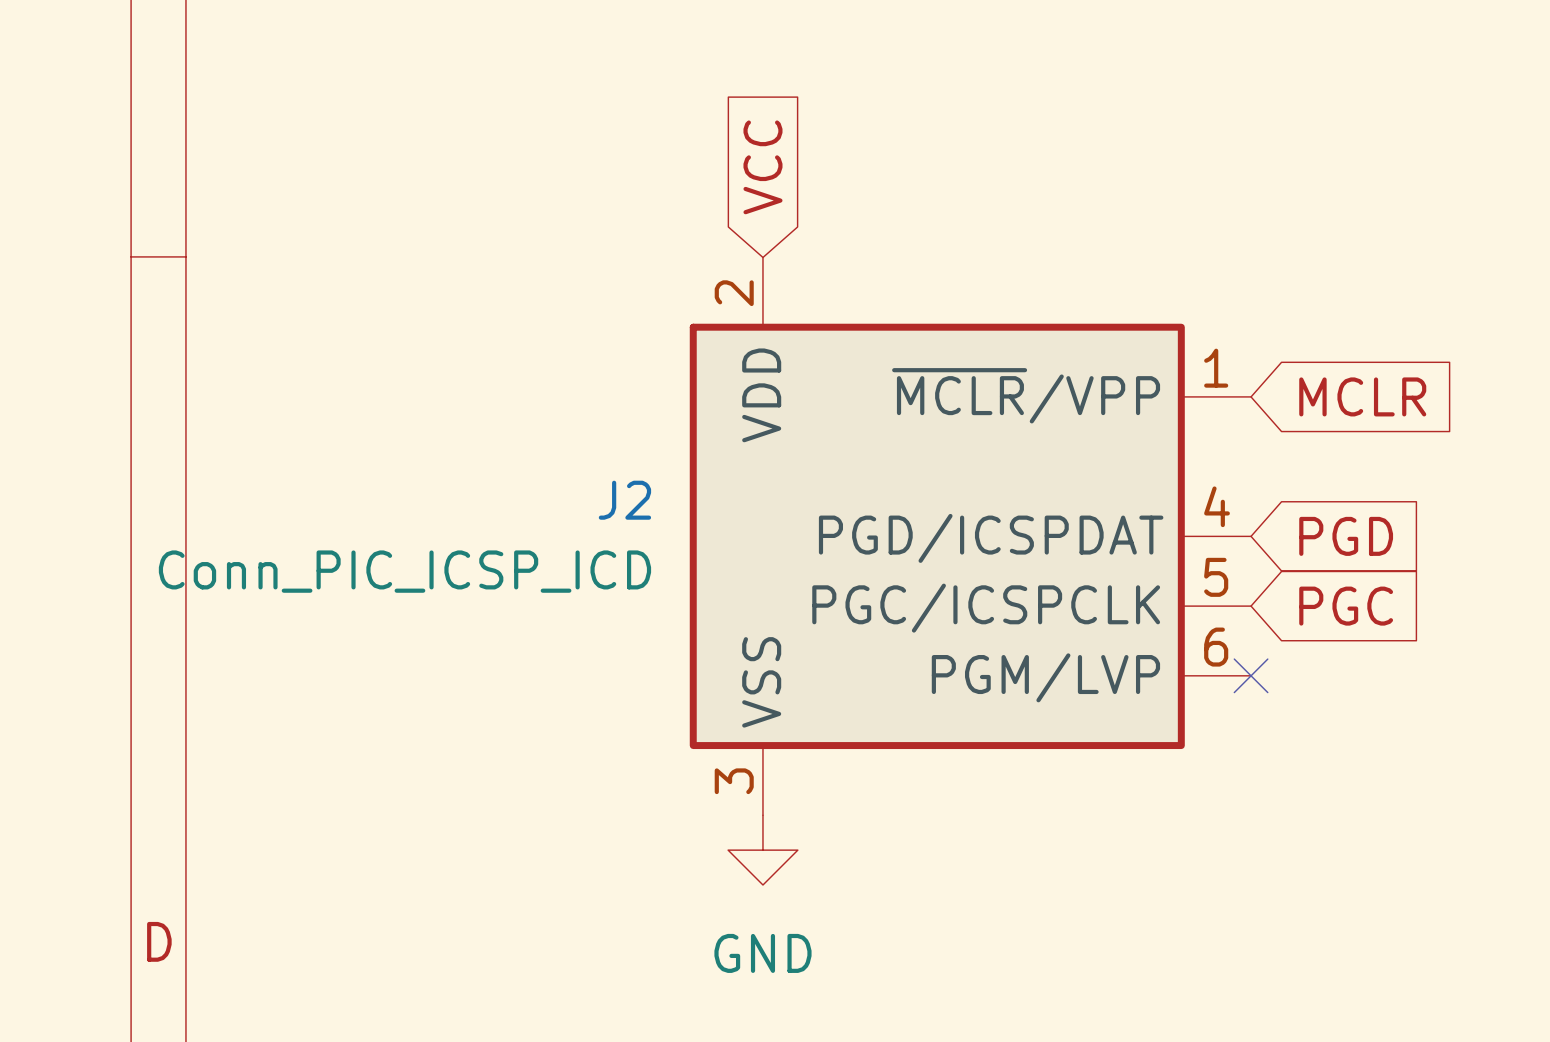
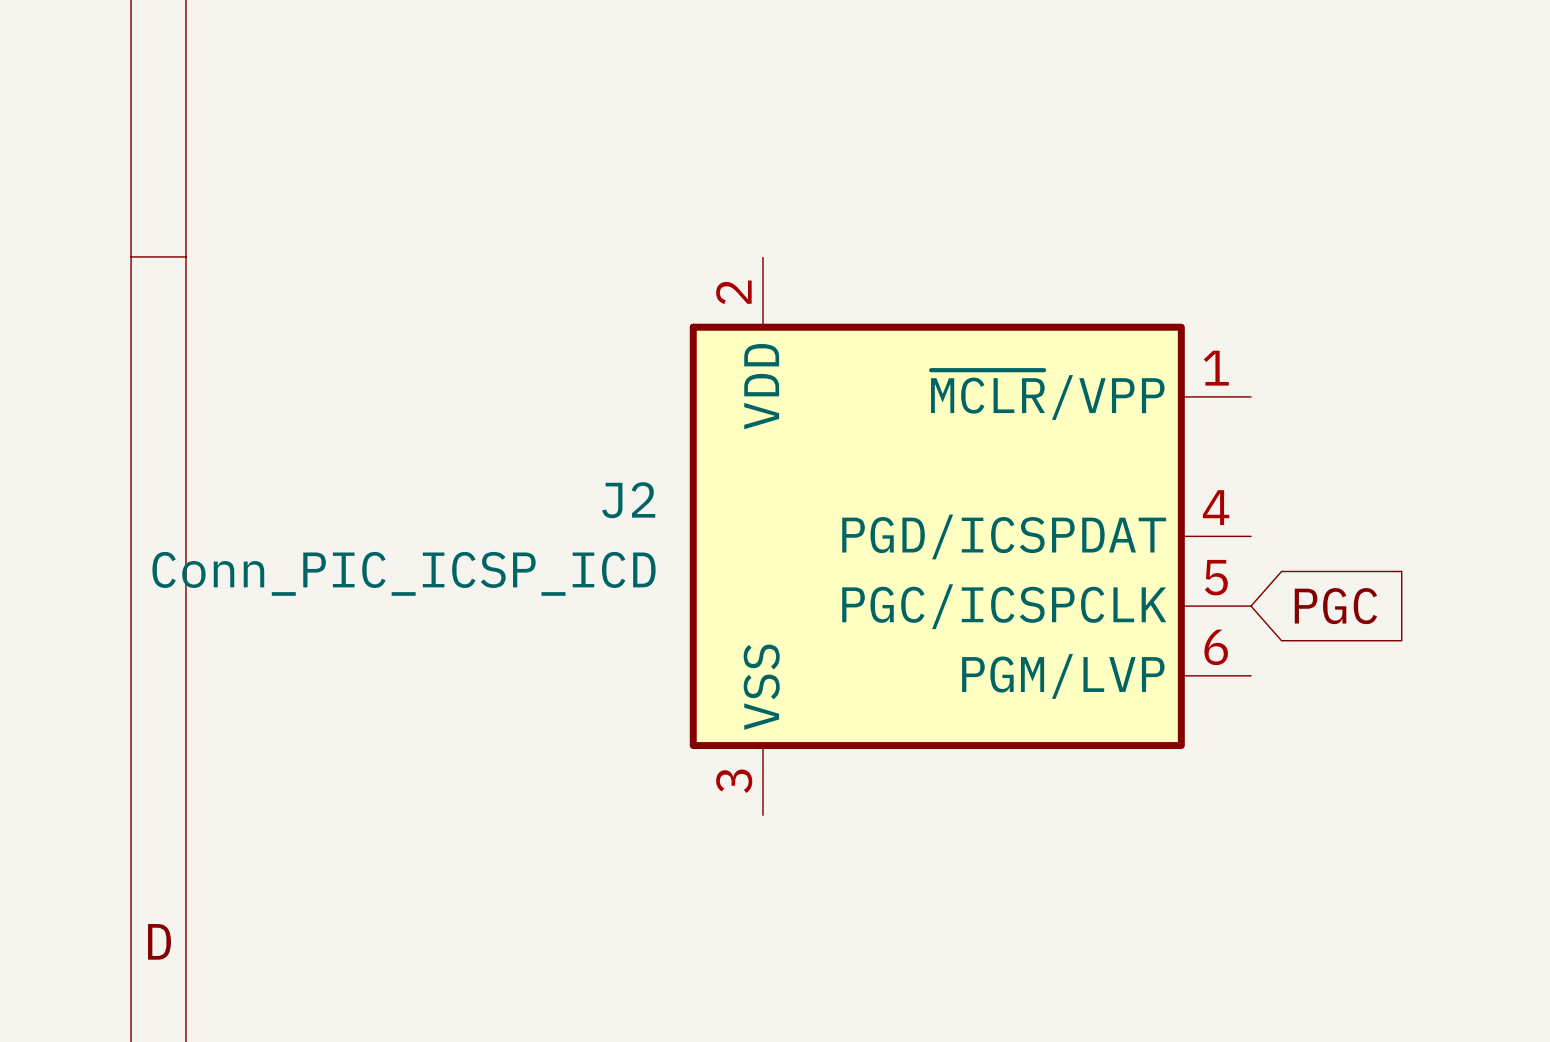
global label: VCC (762, 167) -> none
global label: MCLR (1362, 396) -> none
global label: PGD (1346, 536) -> none
no-connect mark: (1251, 675) -> none
power symbol: GND (762, 850) -> none

